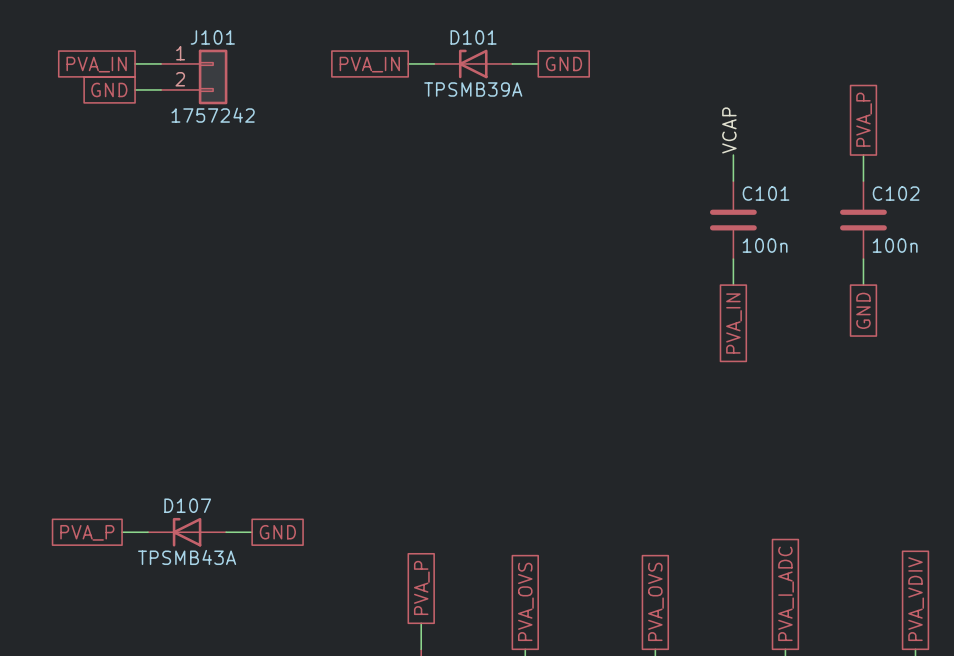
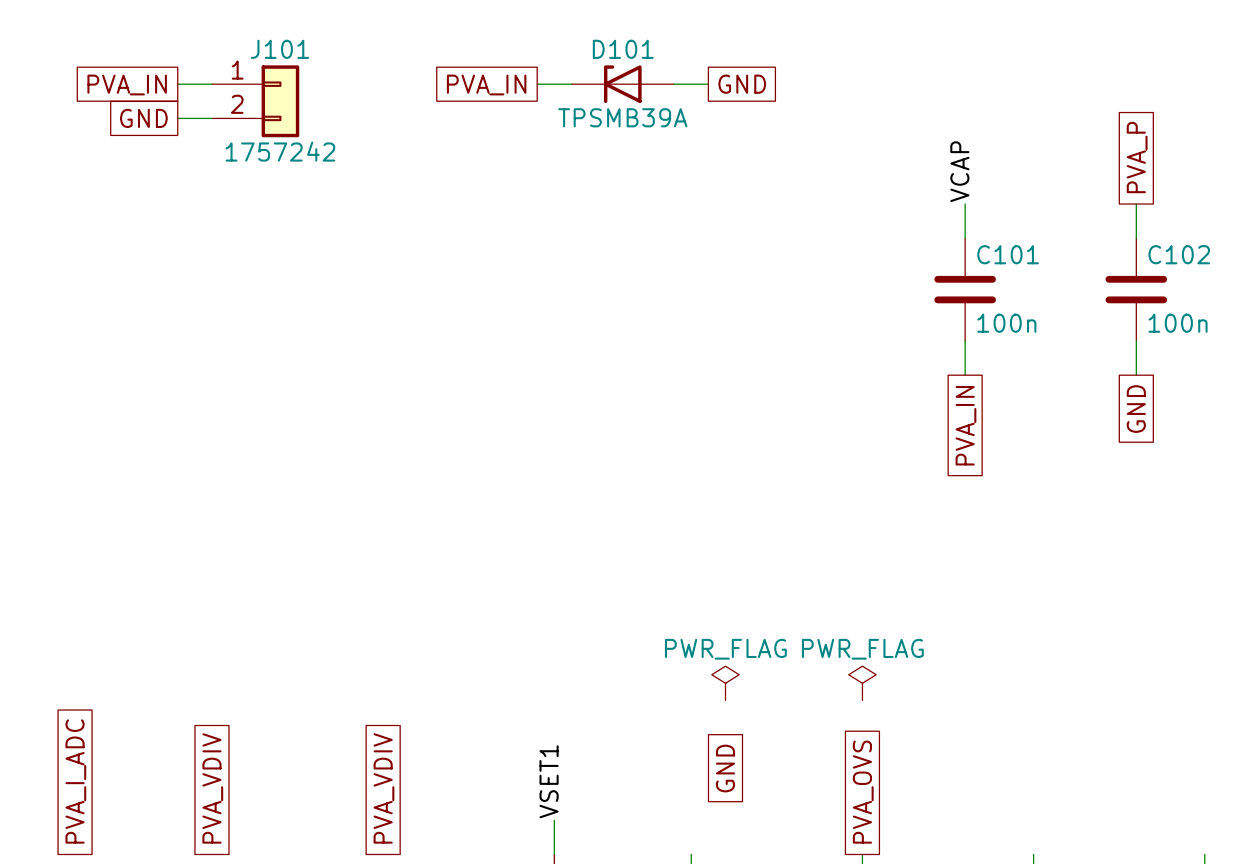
power symbol: none -> PWR_FLAG (725, 683)
power symbol: none -> PWR_FLAG (862, 683)
global label: PVA_P (87, 532) -> none
wire: (122, 532) (148, 532) -> none
D107: TPSMB43A (187, 532) -> none
wire: (226, 532) (252, 532) -> none
global label: GND (277, 532) -> none
global label: none -> GND (725, 768)
global label: PVA_P (421, 587) -> none
global label: none -> PVA_I_ADC (75, 781)
global label: PVA_I_ADC (786, 593) -> none
label: none -> VSET1 (549, 781)
global label: none -> PVA_VDIV (212, 788)
global label: none -> PVA_VDIV (383, 788)
global label: PVA_VDIV (916, 599) -> none
global label: PVA_OVS (525, 601) -> none

